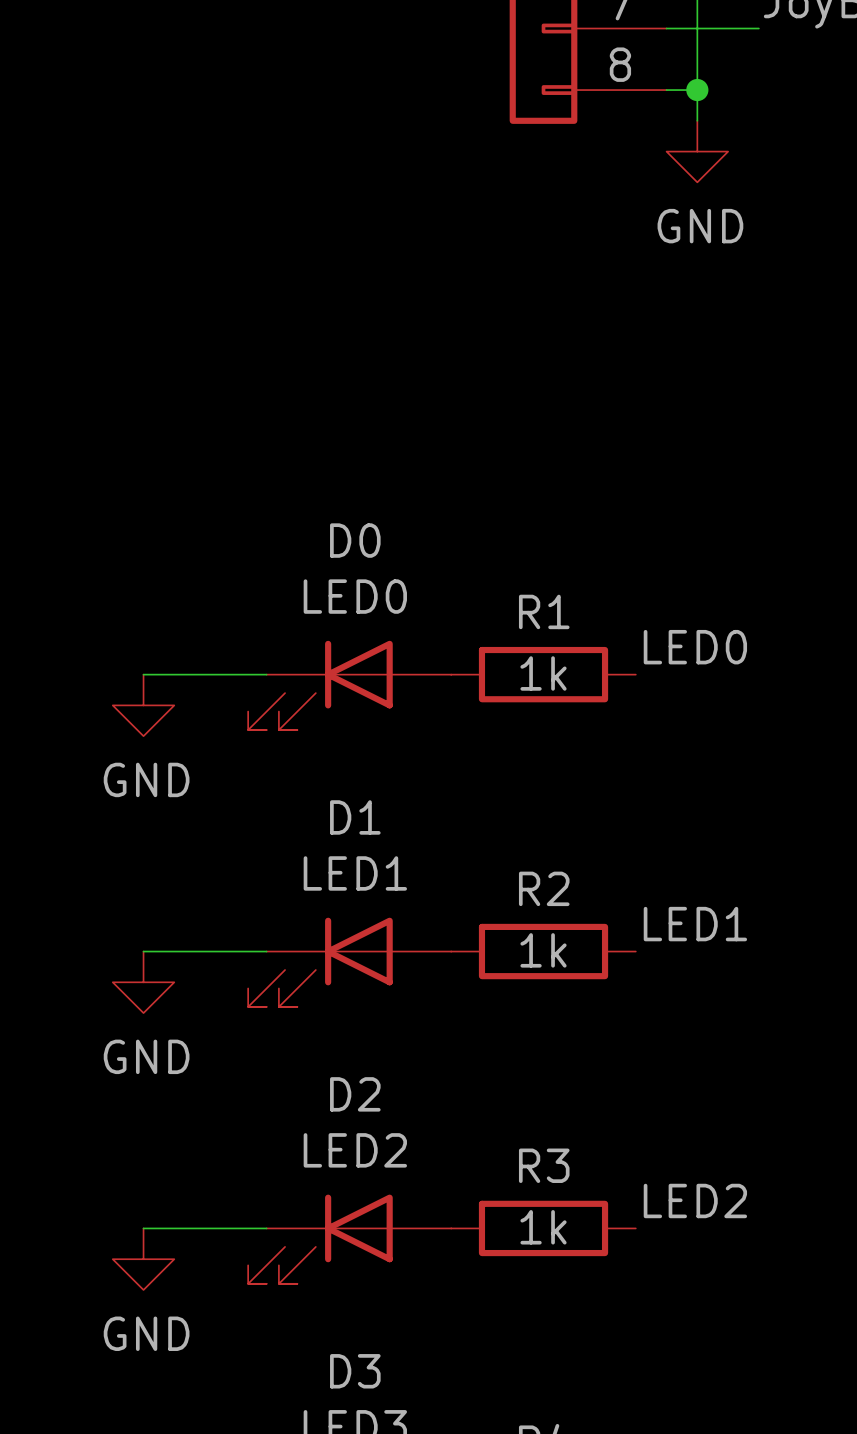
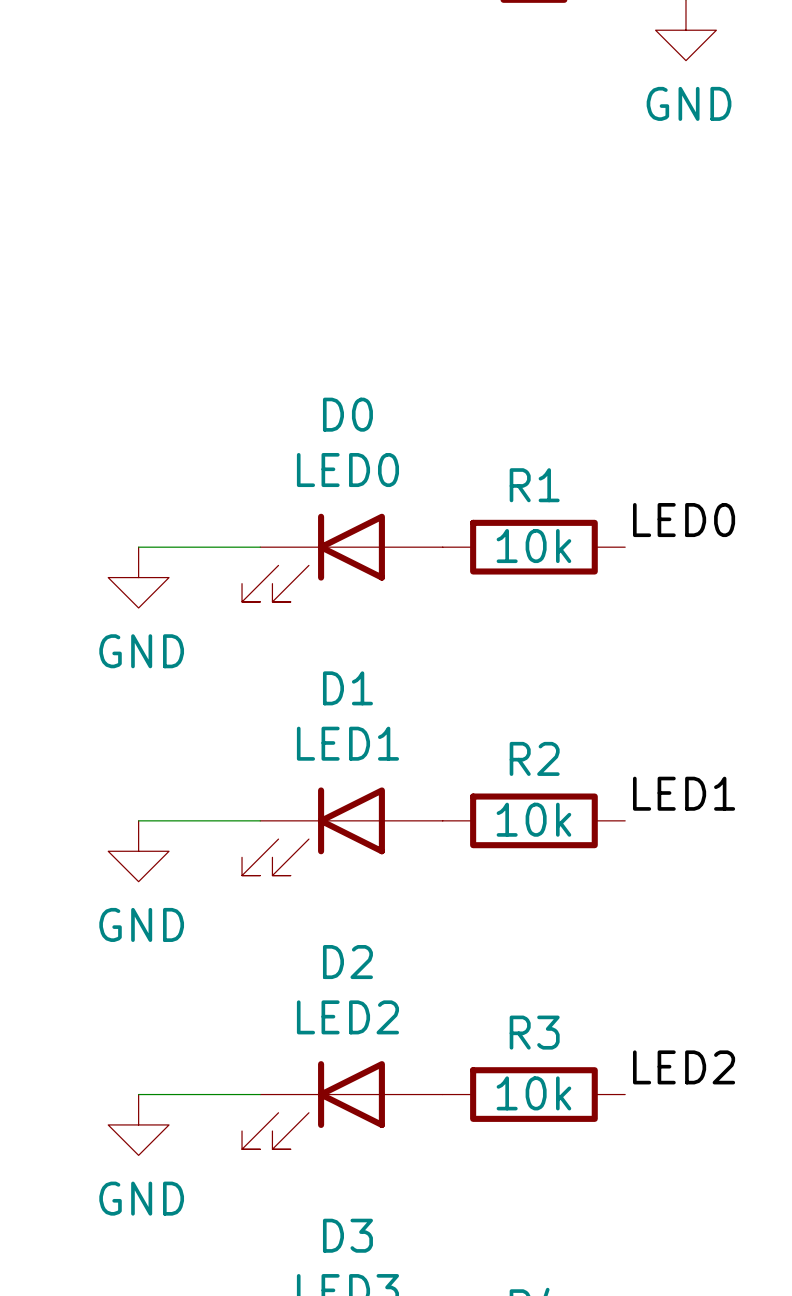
R1 value: 1k (543, 673) -> 10k (533, 546)
R2 value: 1k (543, 950) -> 10k (533, 819)
R3 value: 1k (543, 1227) -> 10k (533, 1093)

